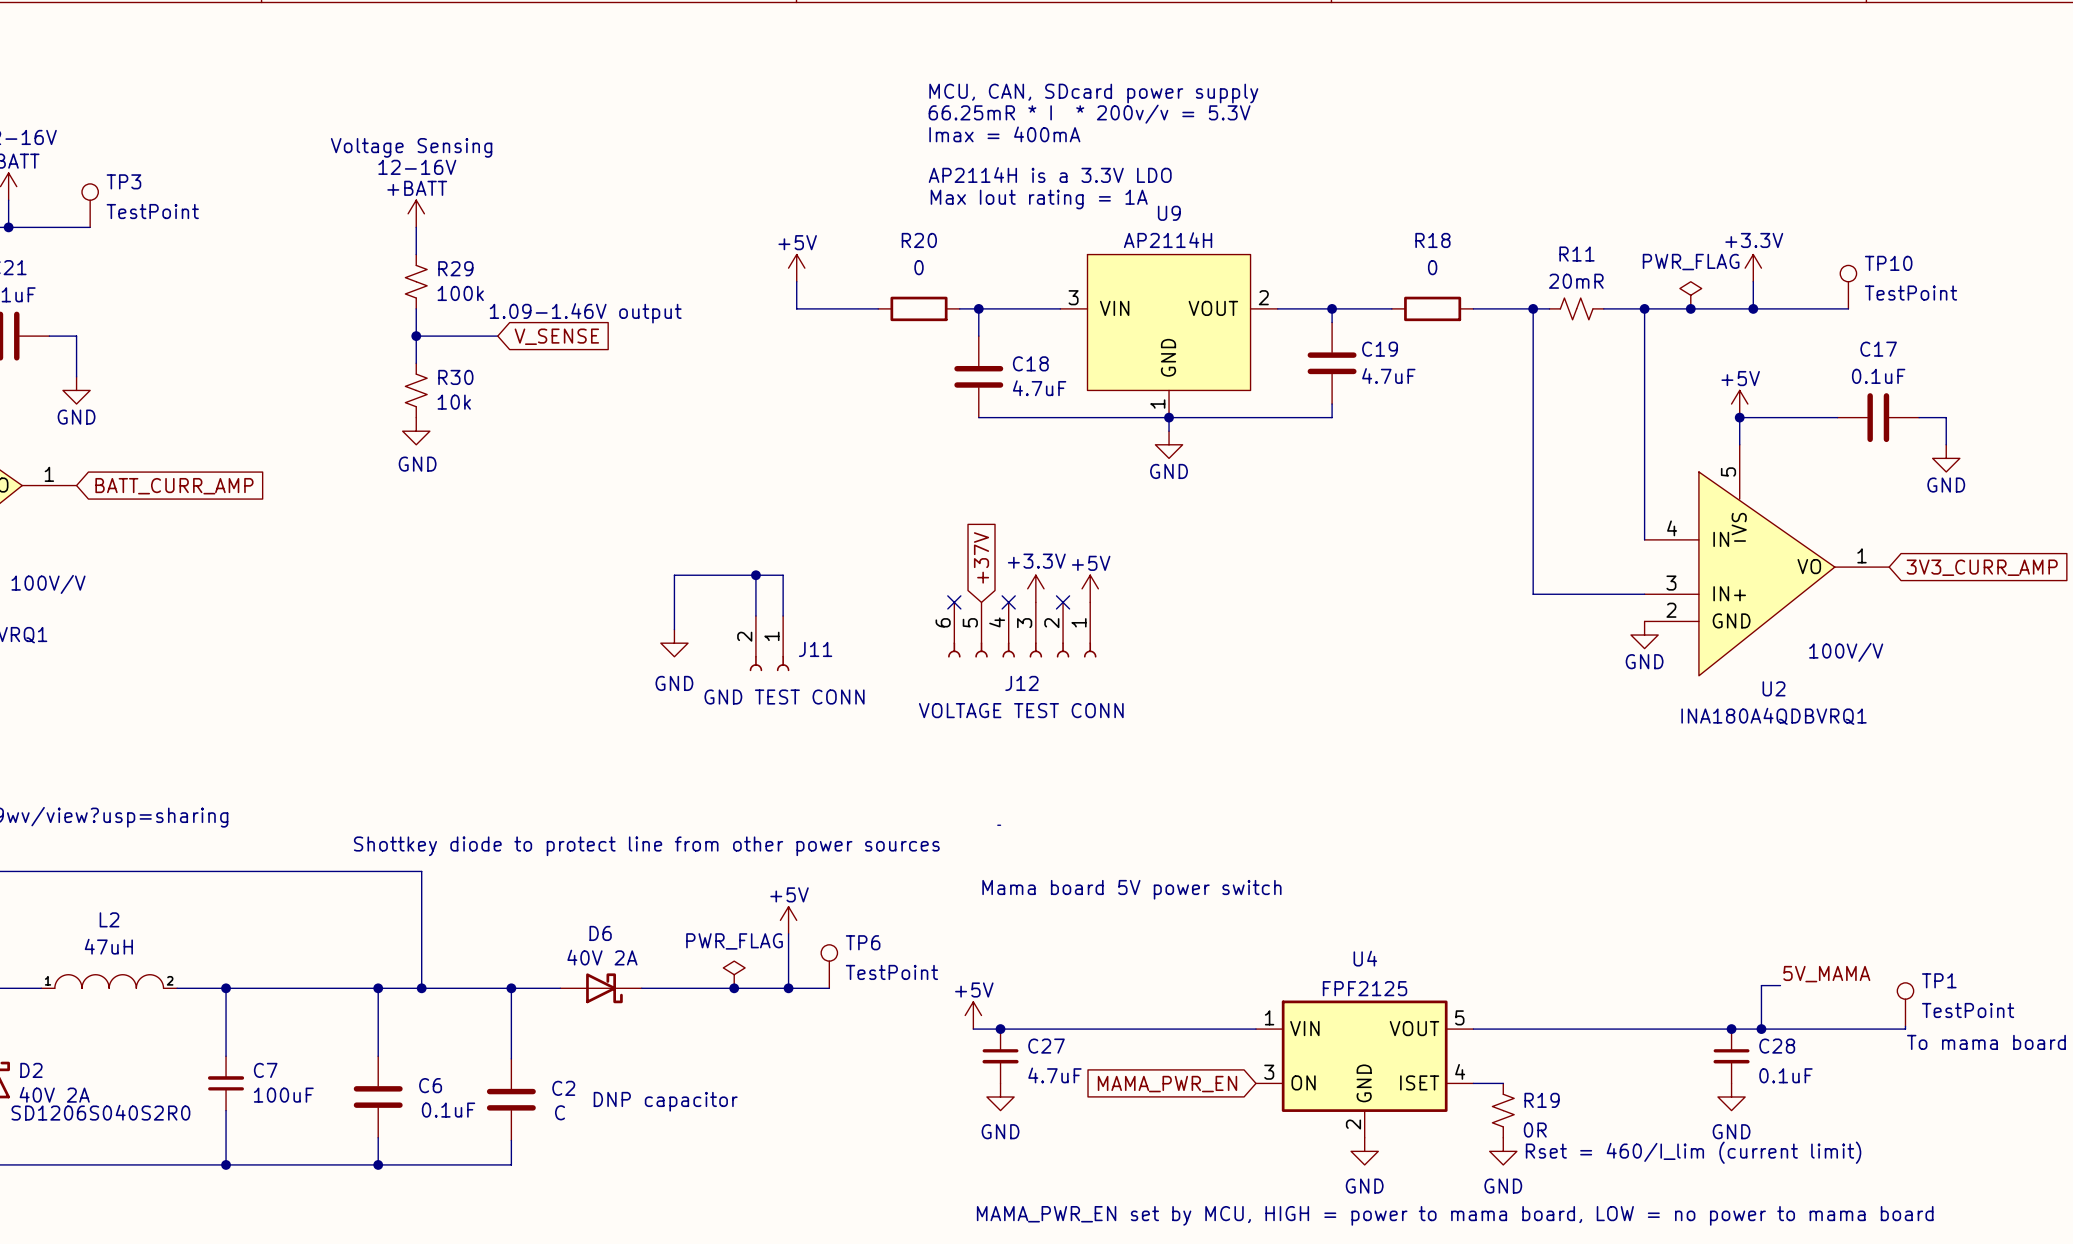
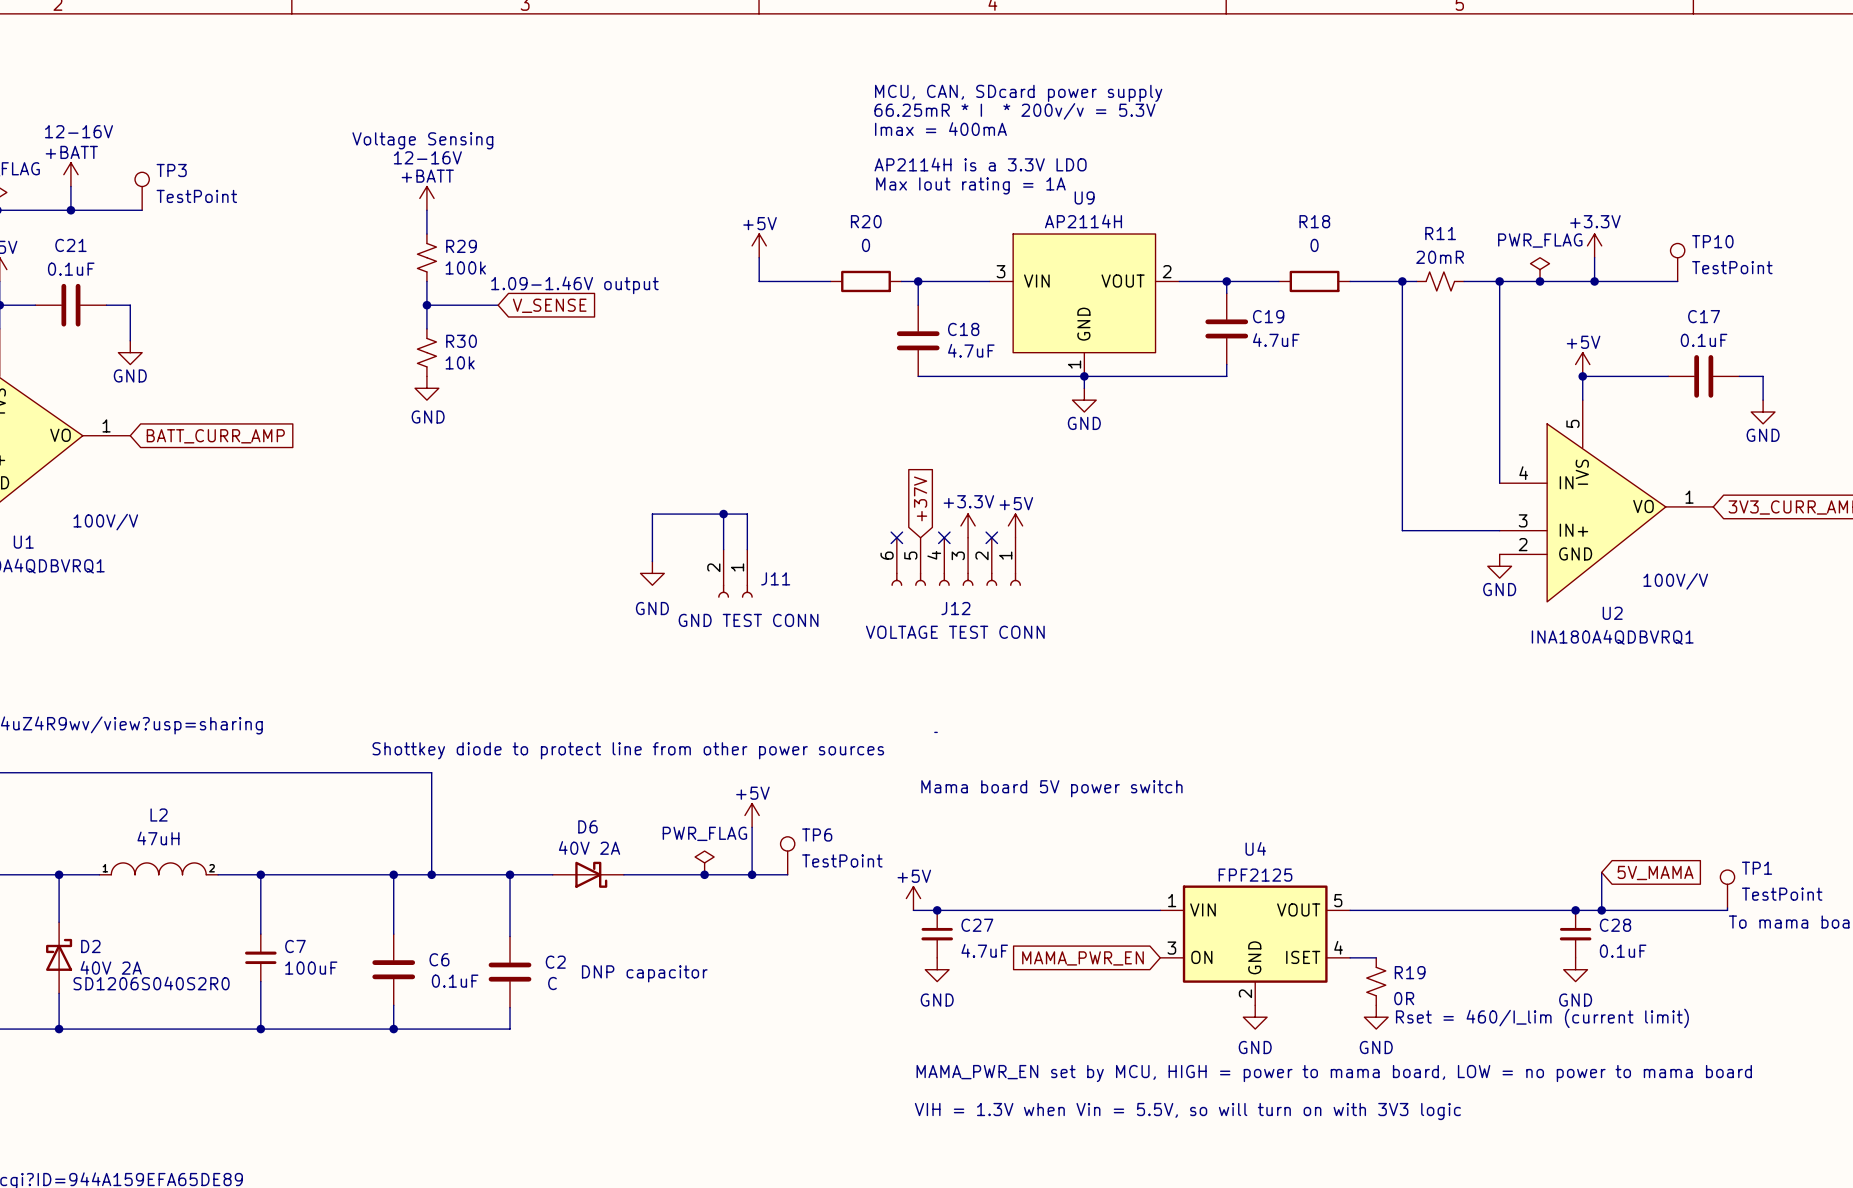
label: 5V_MAMA (1826, 974) -> none
wire: (1761, 985) (1780, 985) -> none
global label: none -> 5V_MAMA (1655, 872)

